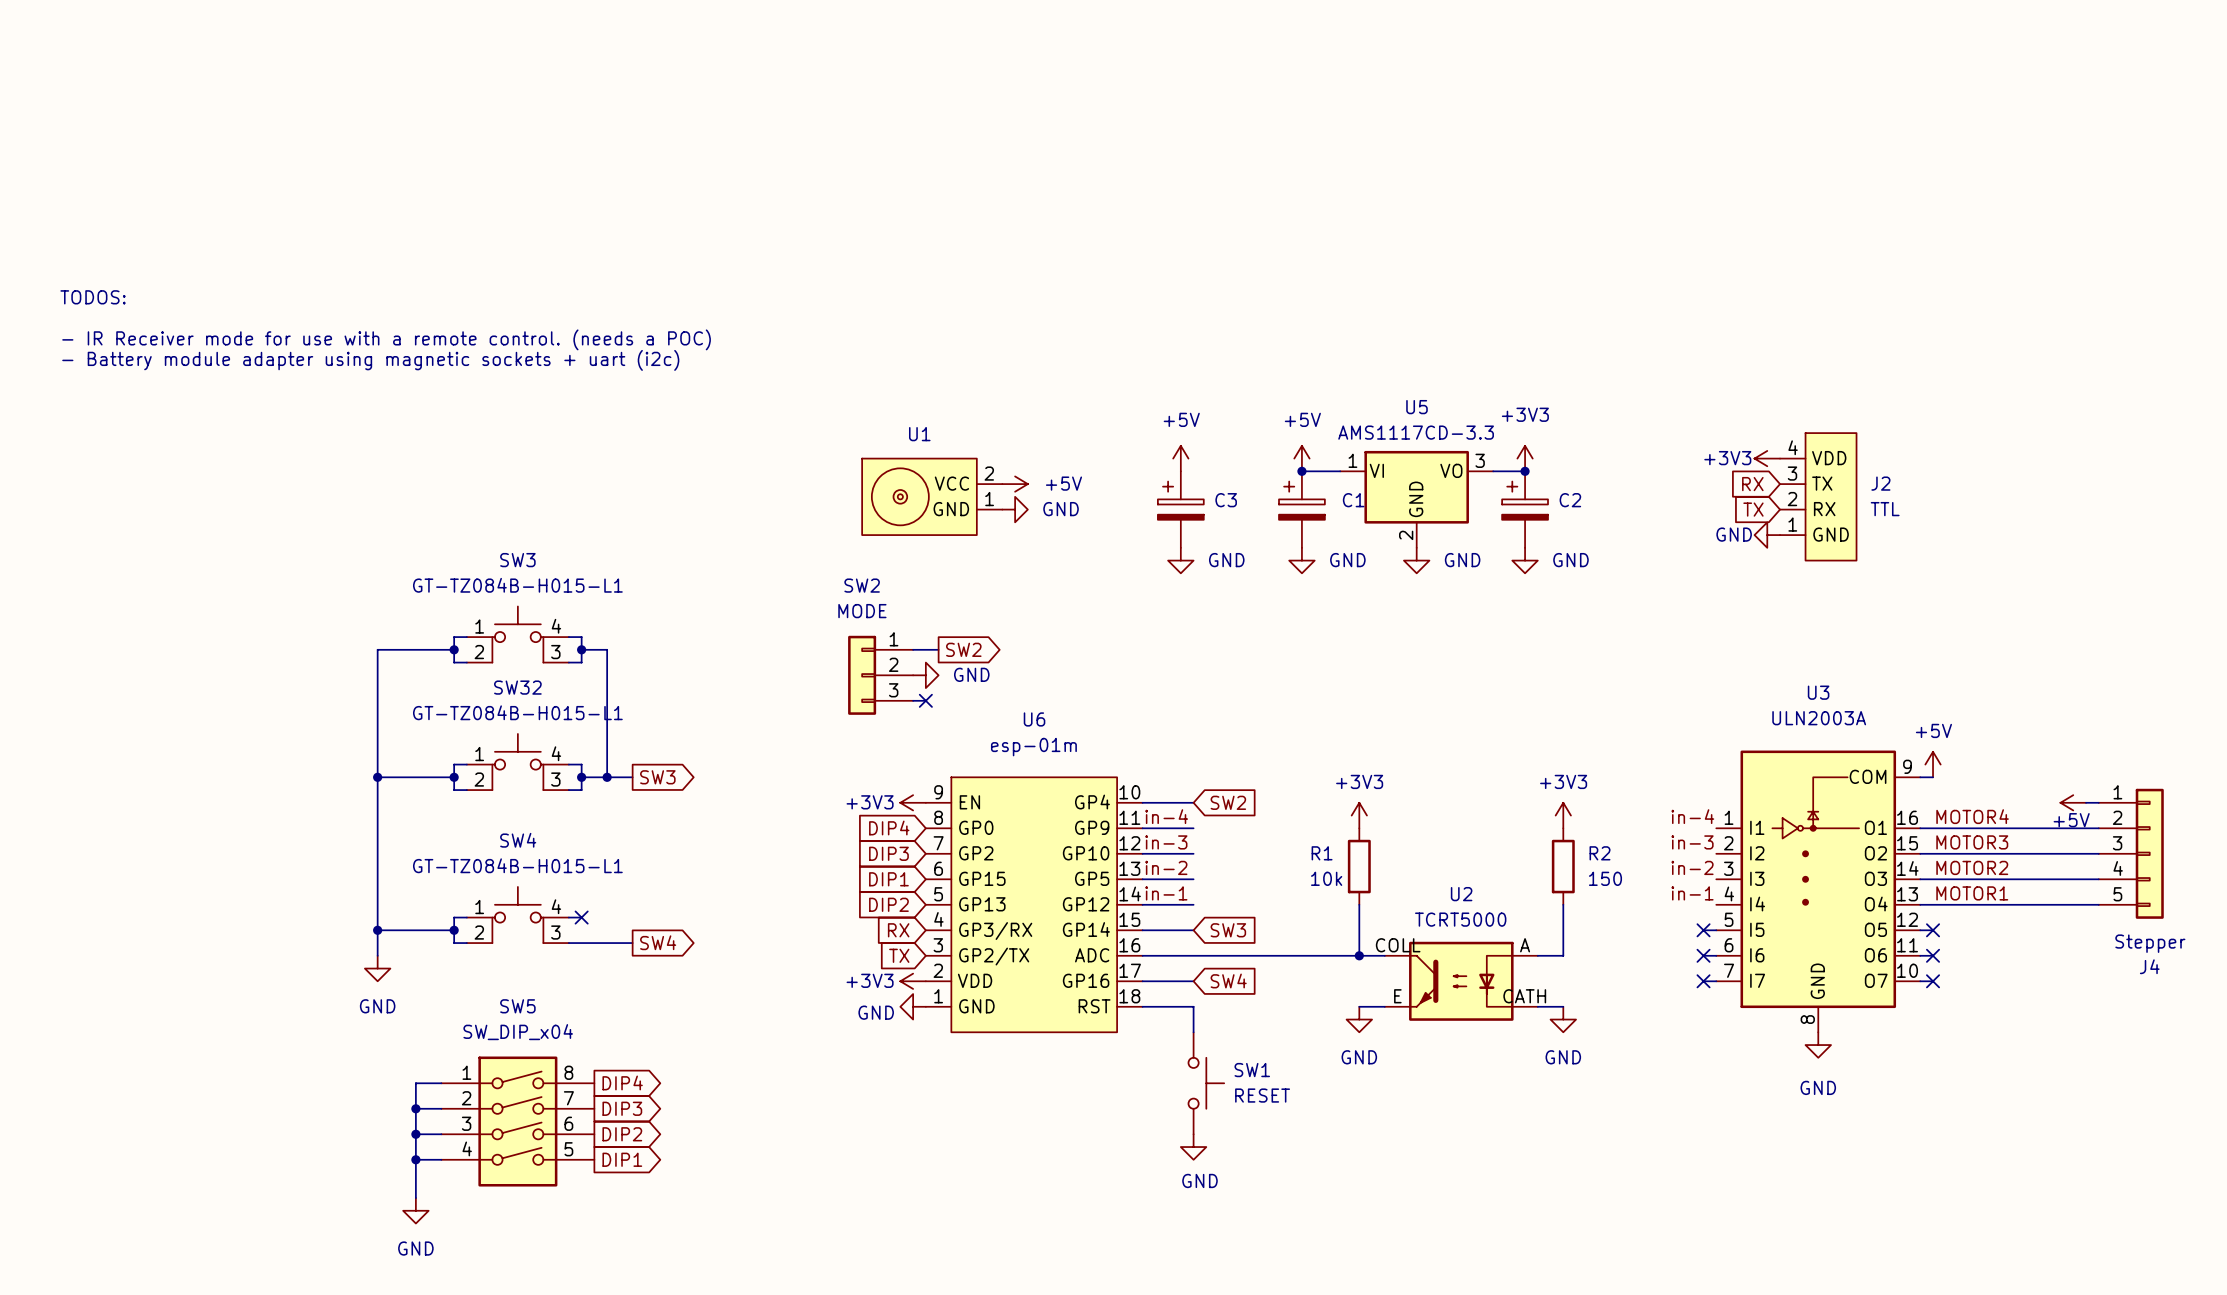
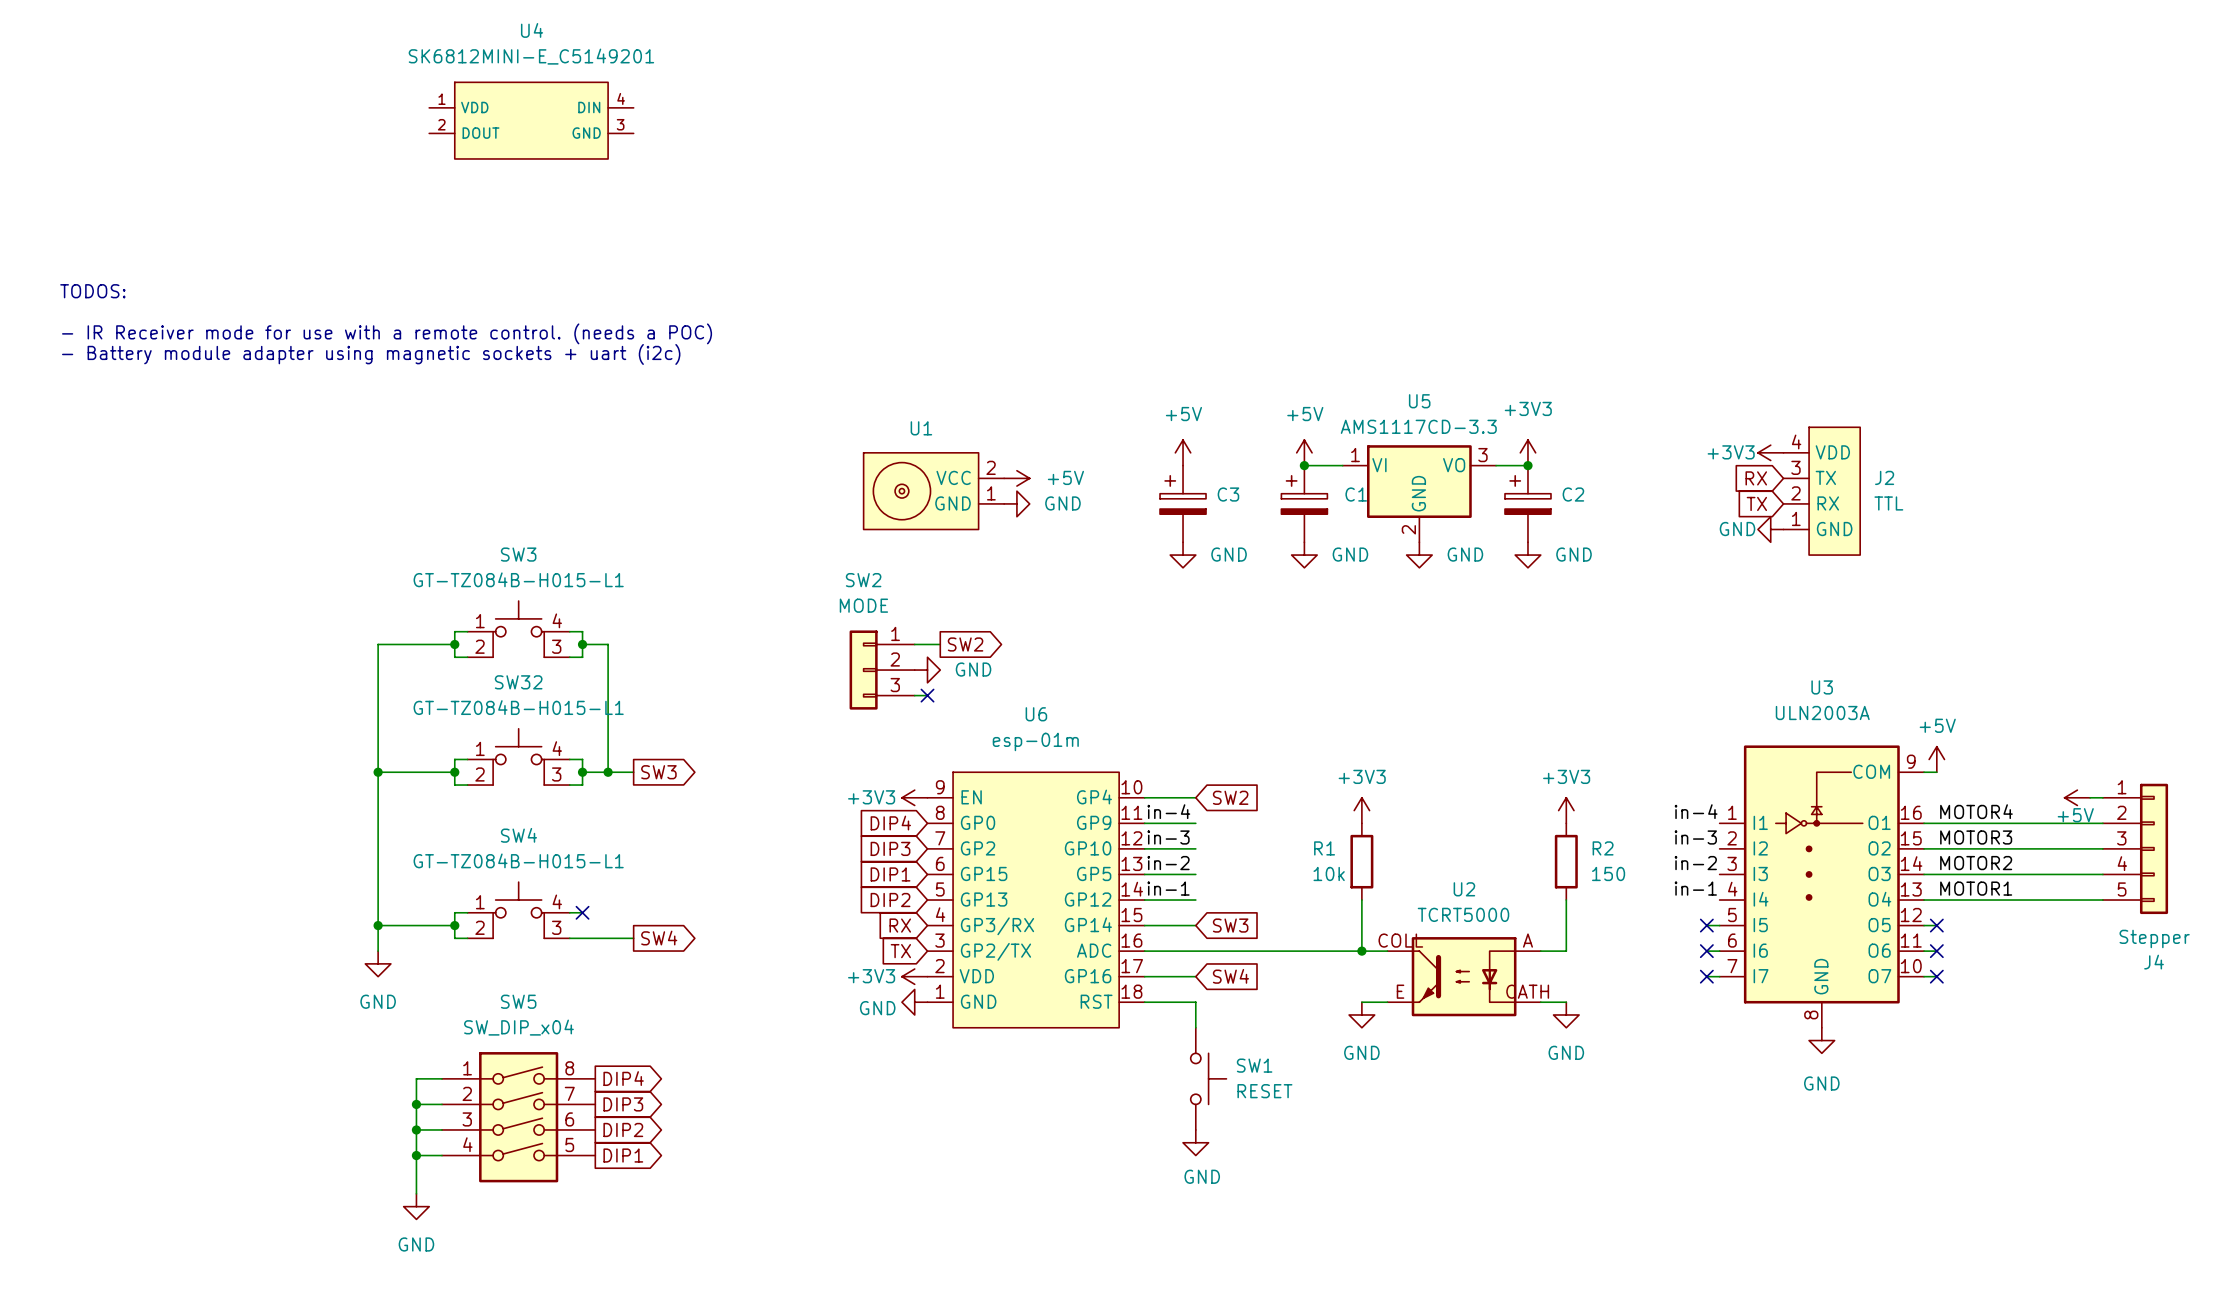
U4: none -> SK6812MINI-E_C5149201 (531, 120)

